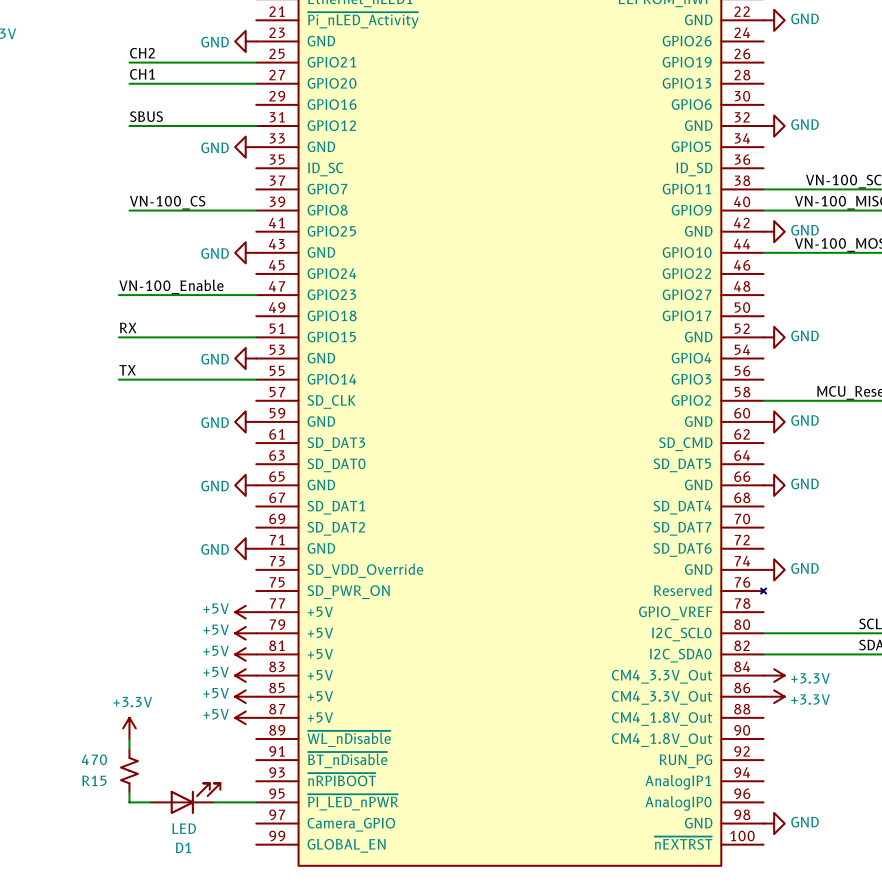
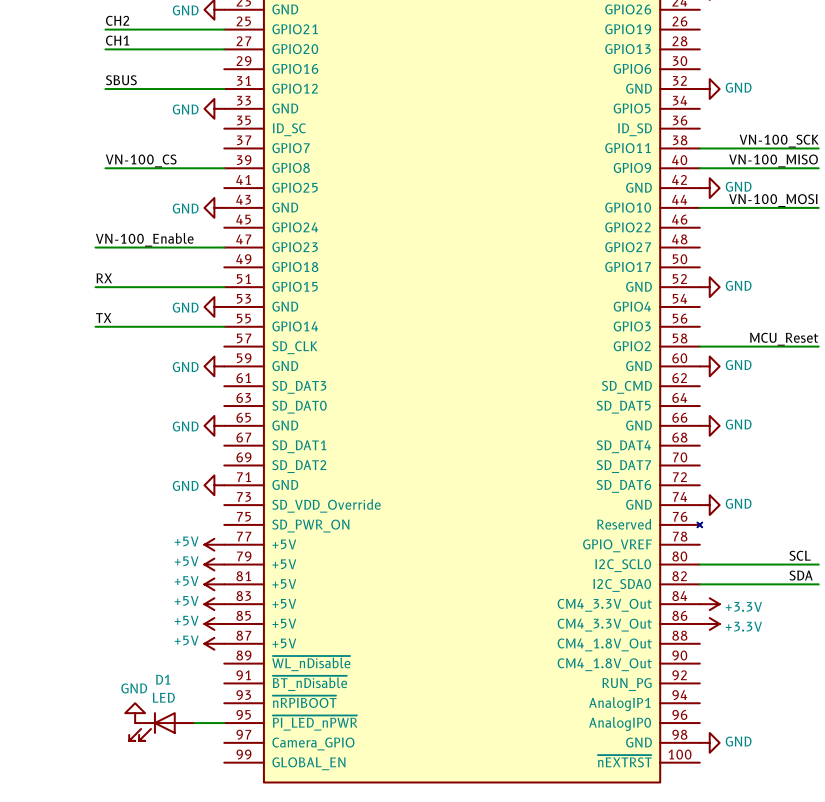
power symbol: +3.3V (129, 728) -> none
wire: (129, 738) (129, 749) -> none
R15: 470 (129, 770) -> none
wire: (129, 791) (129, 802) (150, 802) -> none
power symbol: none -> GND (135, 713)
D1 rotation: 0° (195, 798) -> 180° (152, 726)

